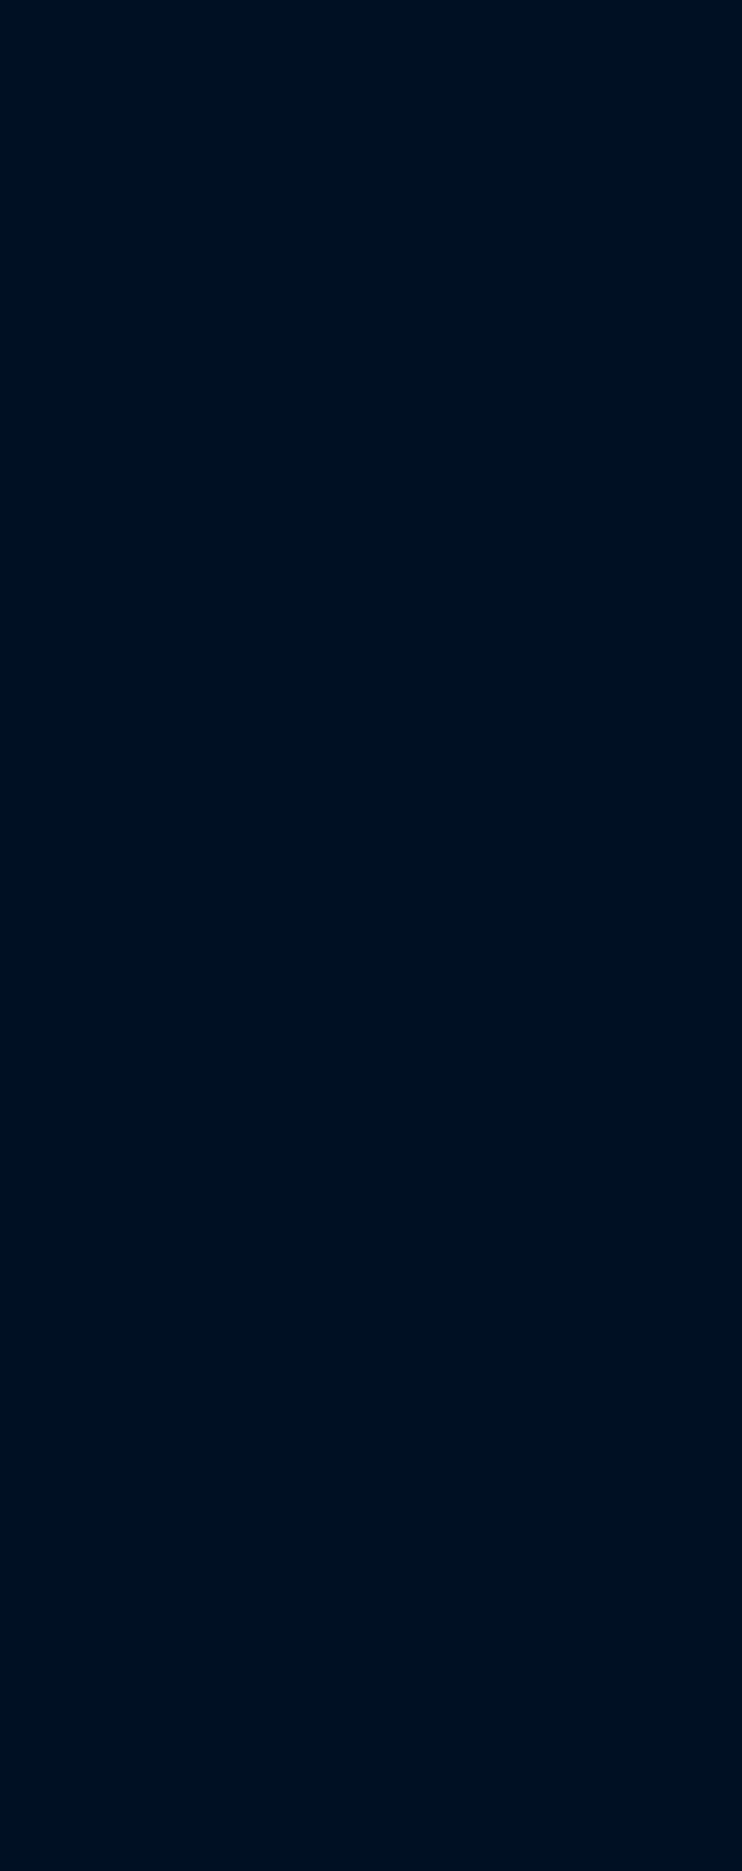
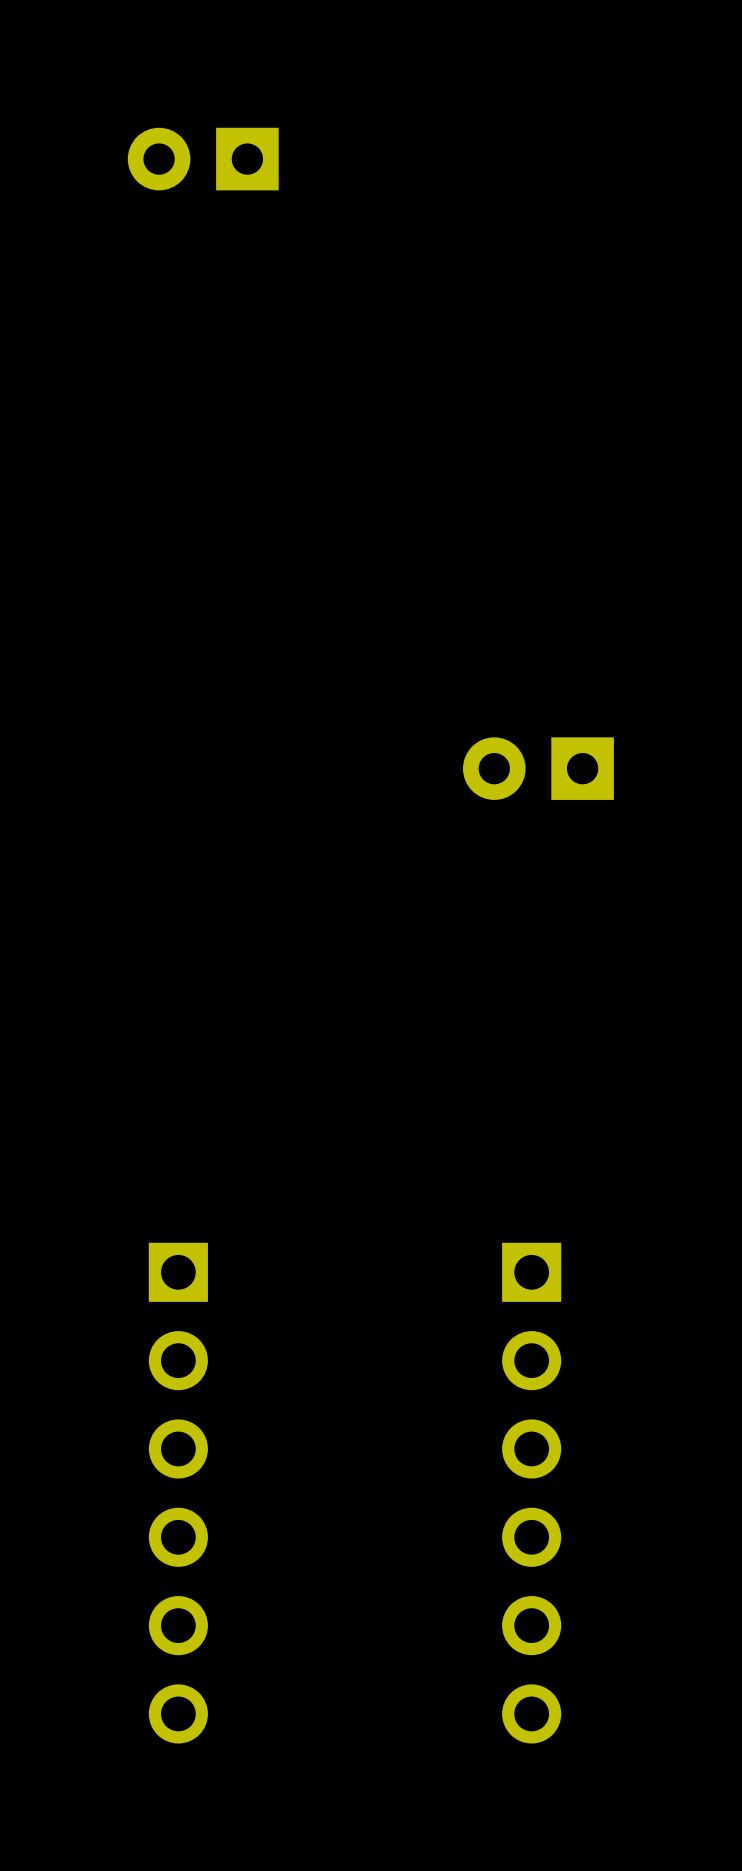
part: none -> (203, 159)
part: none -> (538, 768)
part: none -> (178, 1493)
part: none -> (531, 1493)

